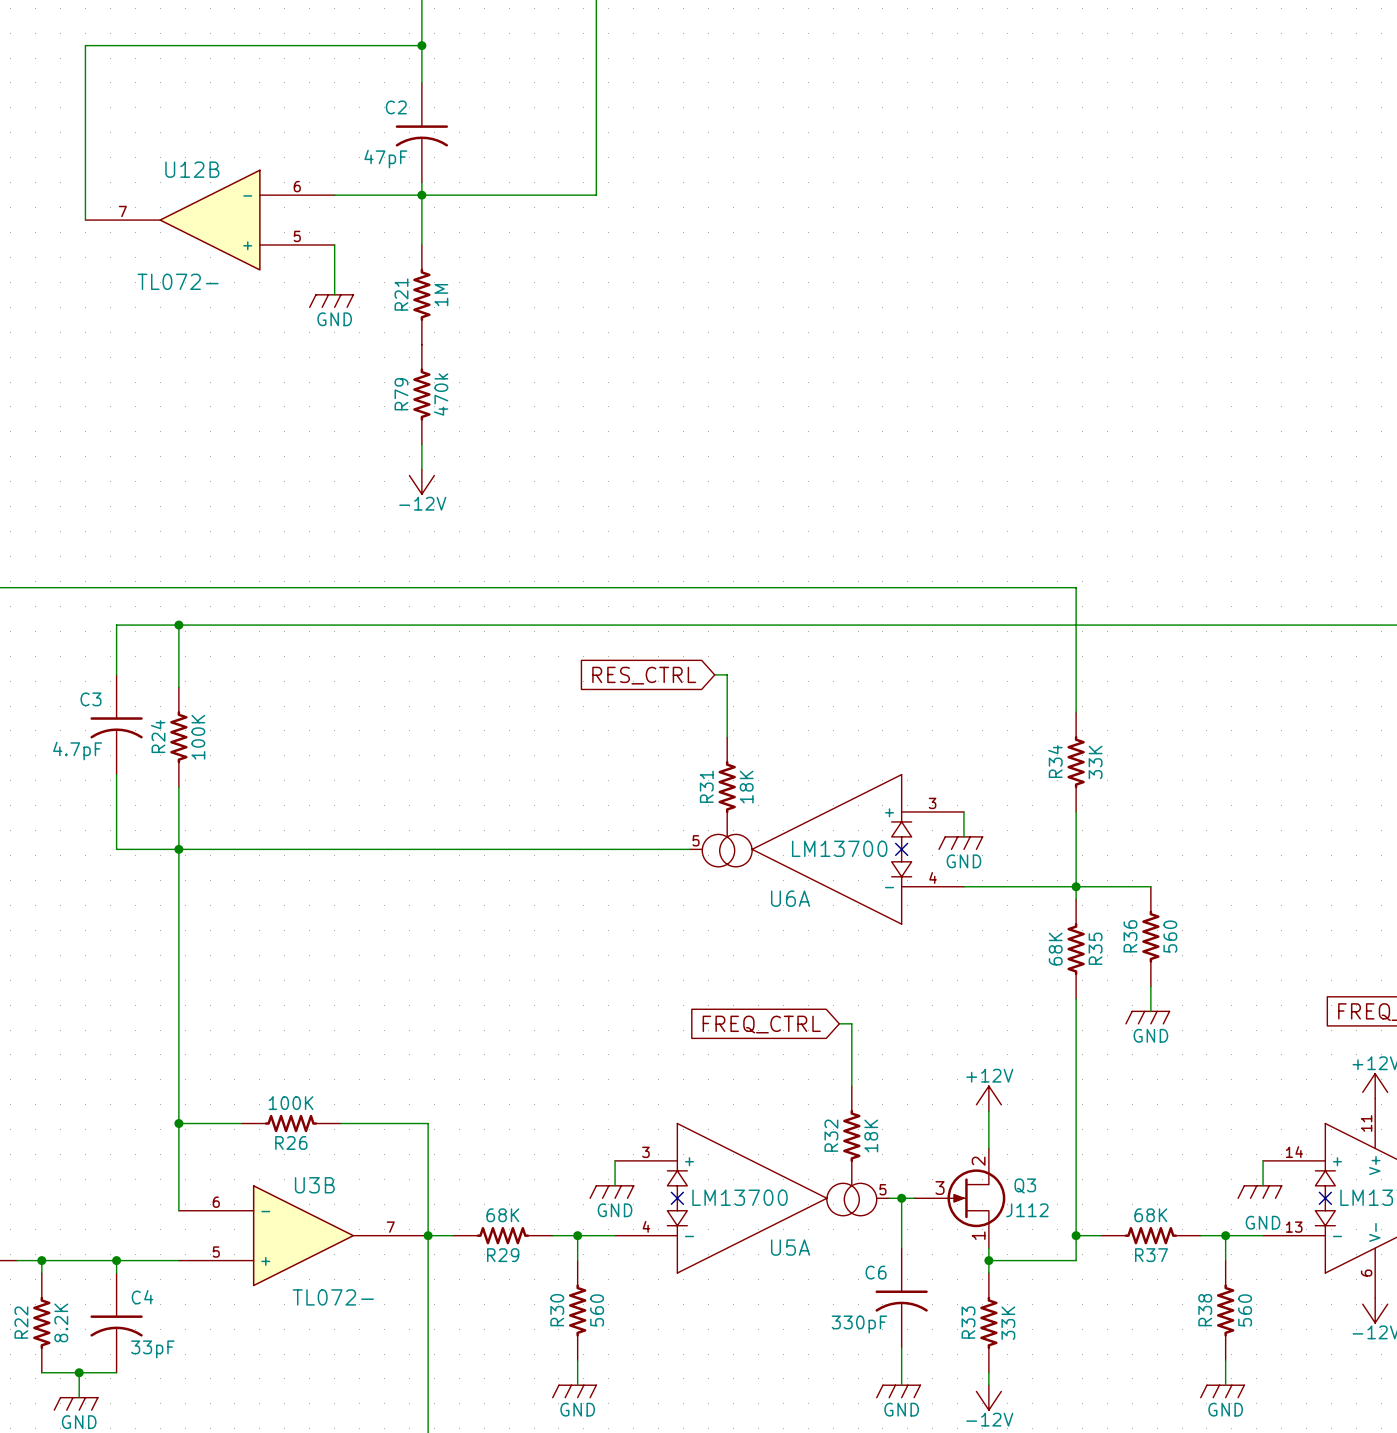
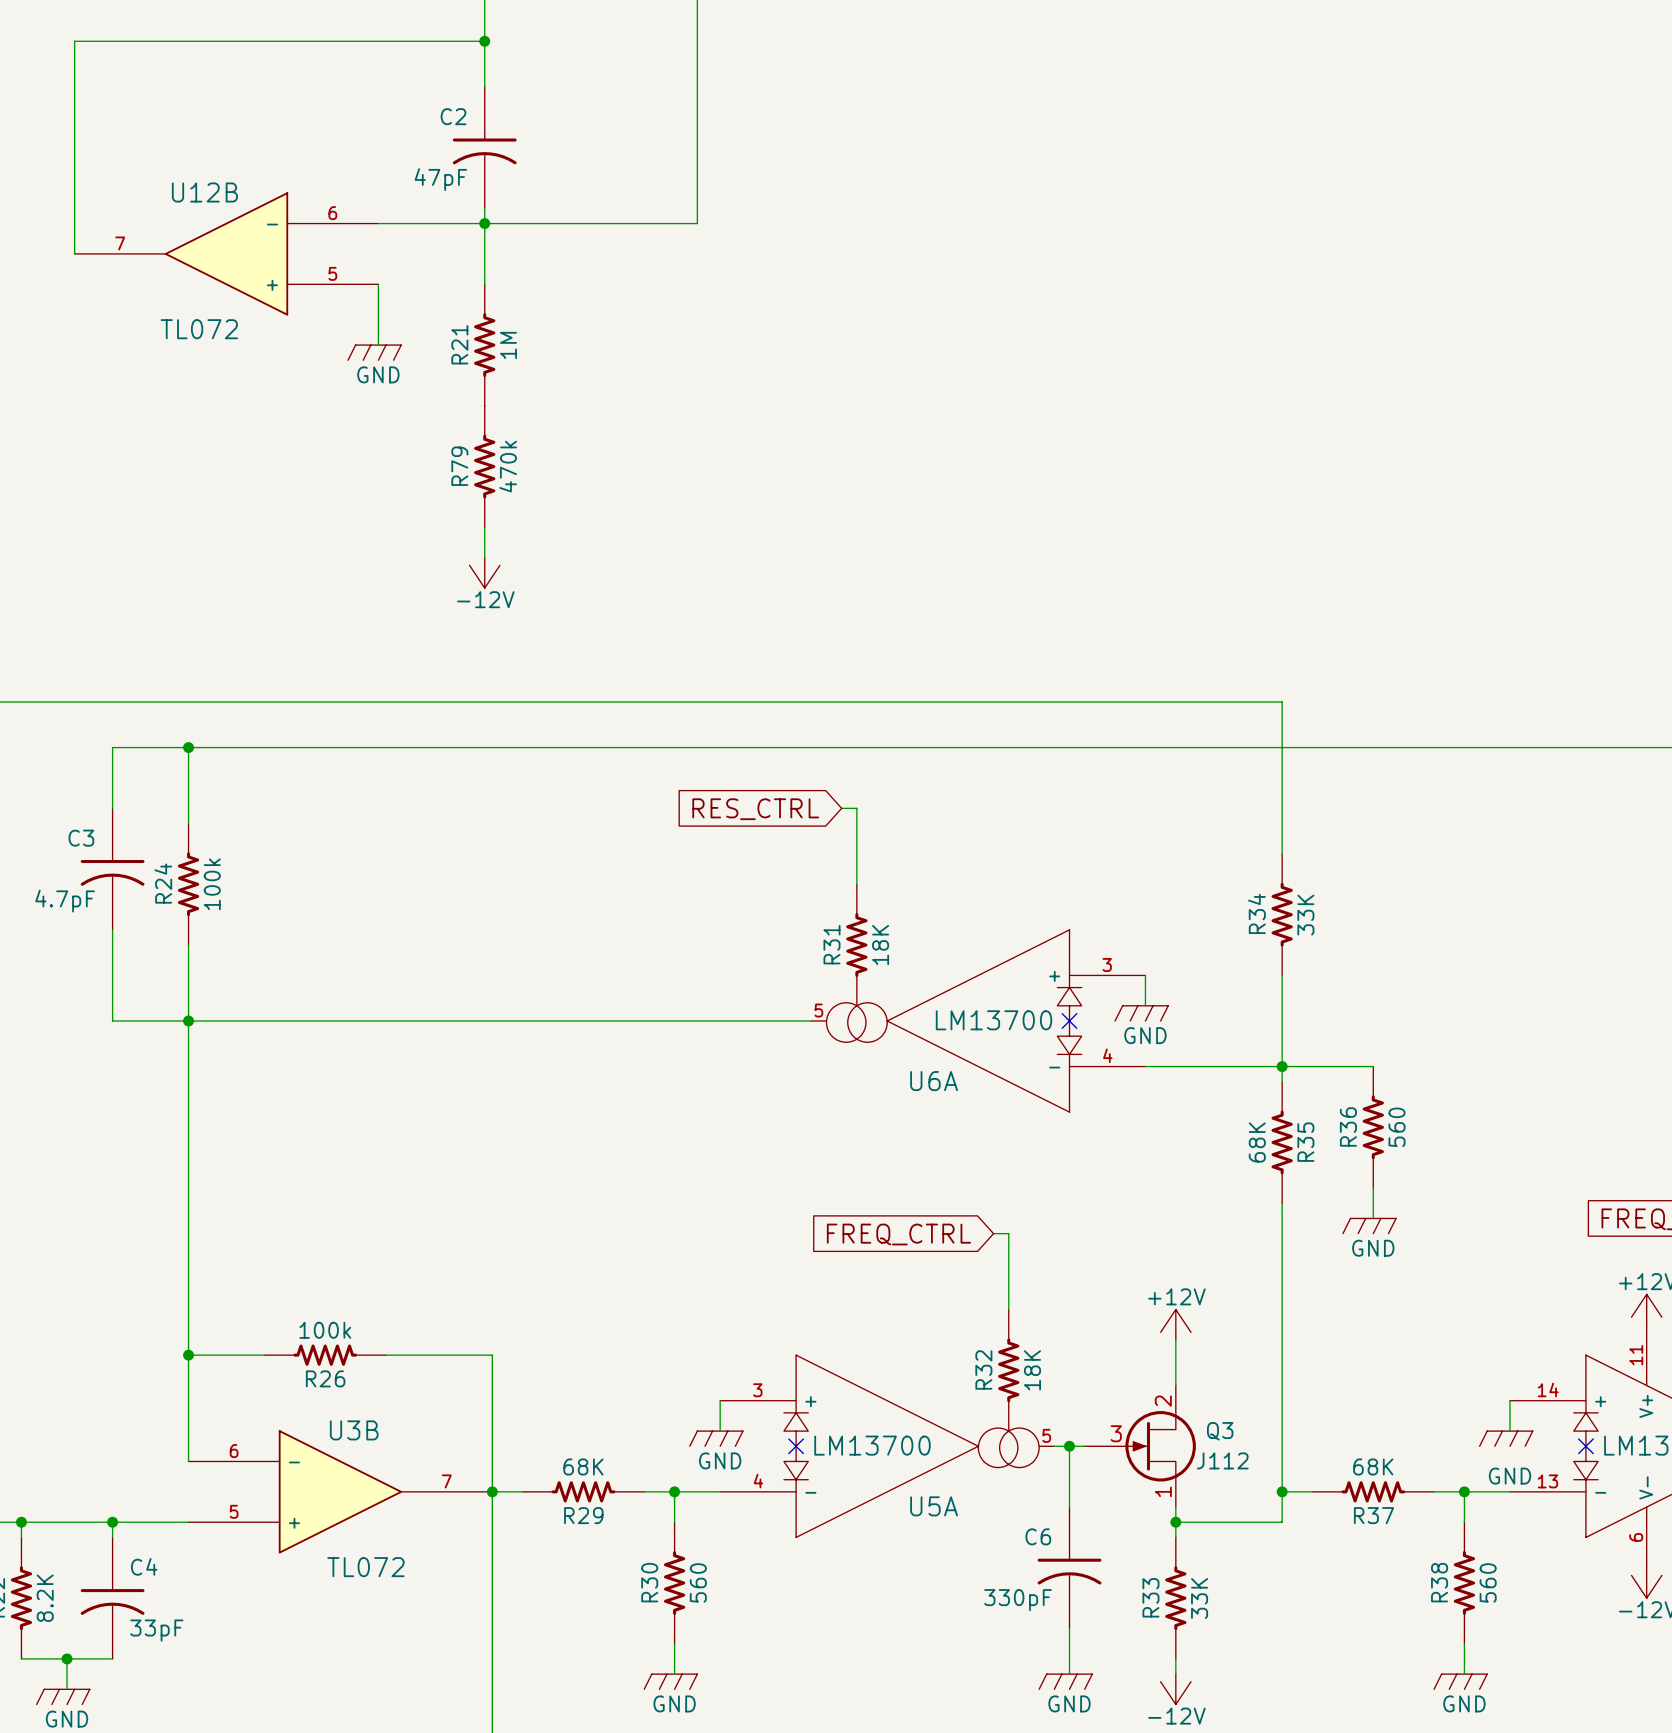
U12B value: TL072- (178, 281) -> TL072 (199, 329)
R24 value: 100K (198, 737) -> 100k (212, 884)
R26 value: 100K (291, 1103) -> 100k (325, 1330)
U3B value: TL072- (333, 1297) -> TL072 (365, 1567)

